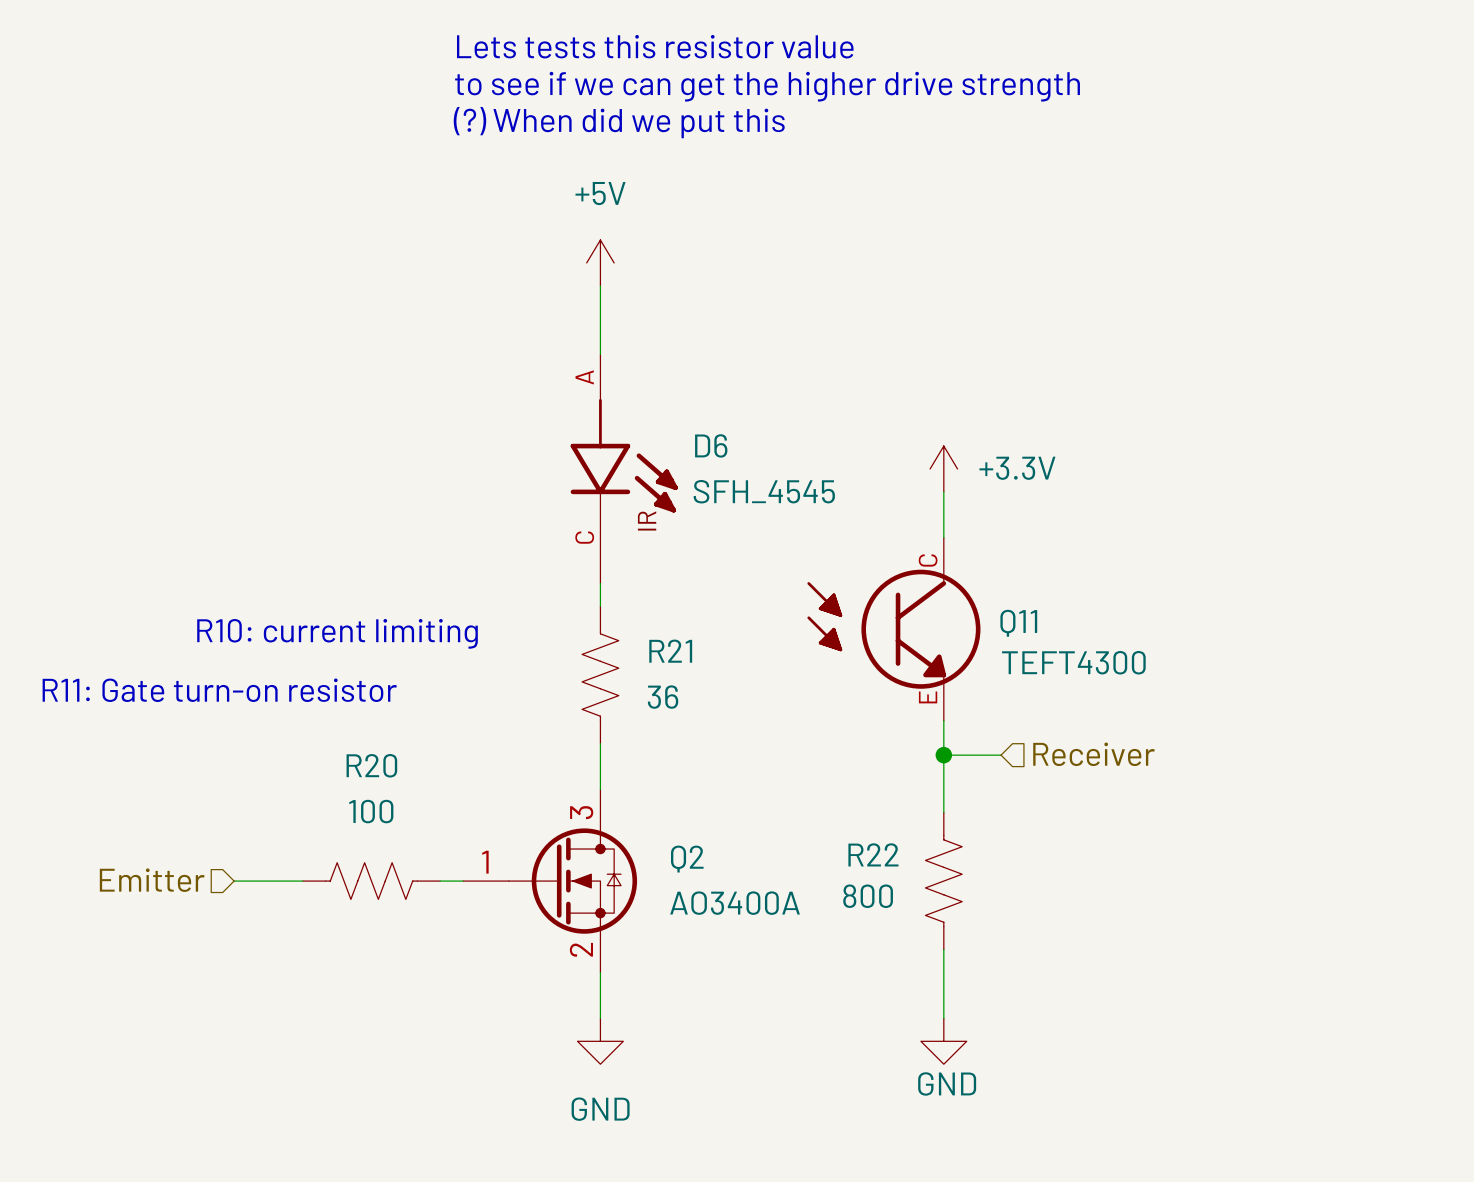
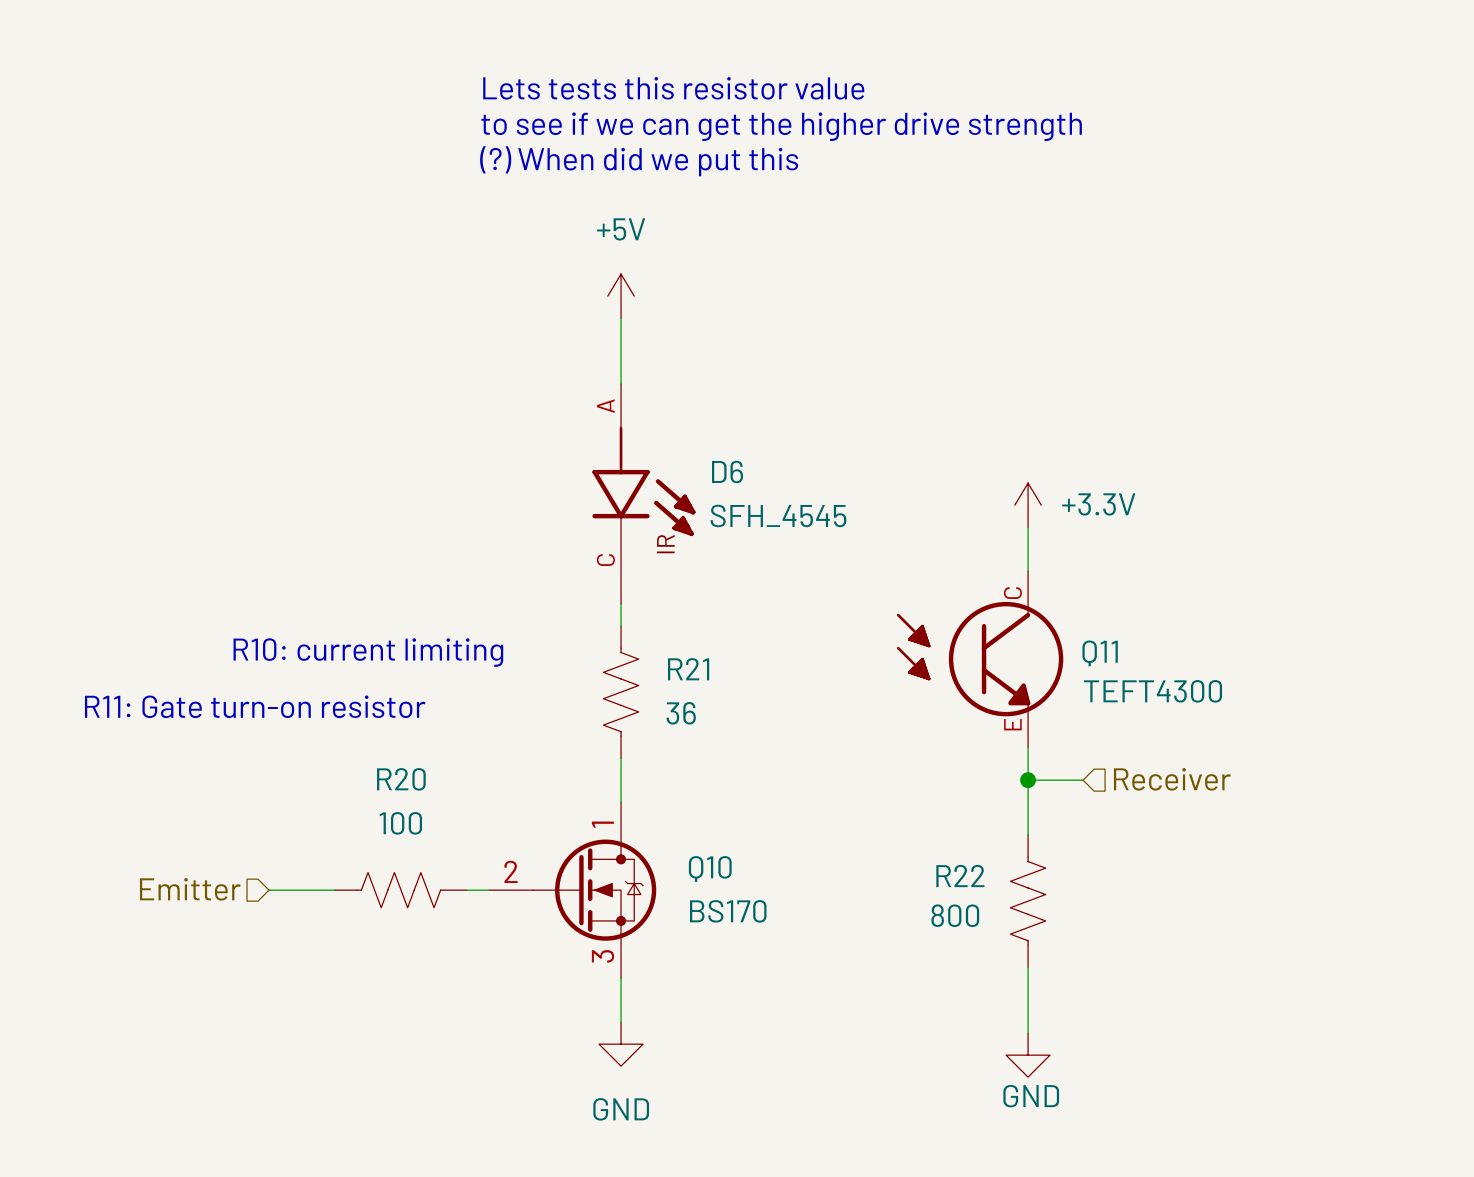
power symbol position: +3.3V (943, 468) -> +3.3V (1028, 505)
wire: (943, 491) (943, 537) -> (1028, 527) (1028, 571)
Q11 position: (893, 629) -> (980, 659)
wire: (943, 720) (943, 812) -> (1028, 747) (1028, 835)
hierarchical label position: Receiver (1093, 754) -> Receiver (1172, 779)
wire: (943, 755) (1001, 755) -> (1028, 780) (1083, 780)
junction position: (943, 755) -> (1028, 780)
Q2: AO3400A (550, 881) -> none
Q10: none -> BS170 (572, 890)
R22 position: (943, 881) -> (1028, 901)
wire: (943, 949) (943, 1018) -> (1028, 967) (1028, 1033)
power symbol position: GND (943, 1041) -> GND (1028, 1055)

